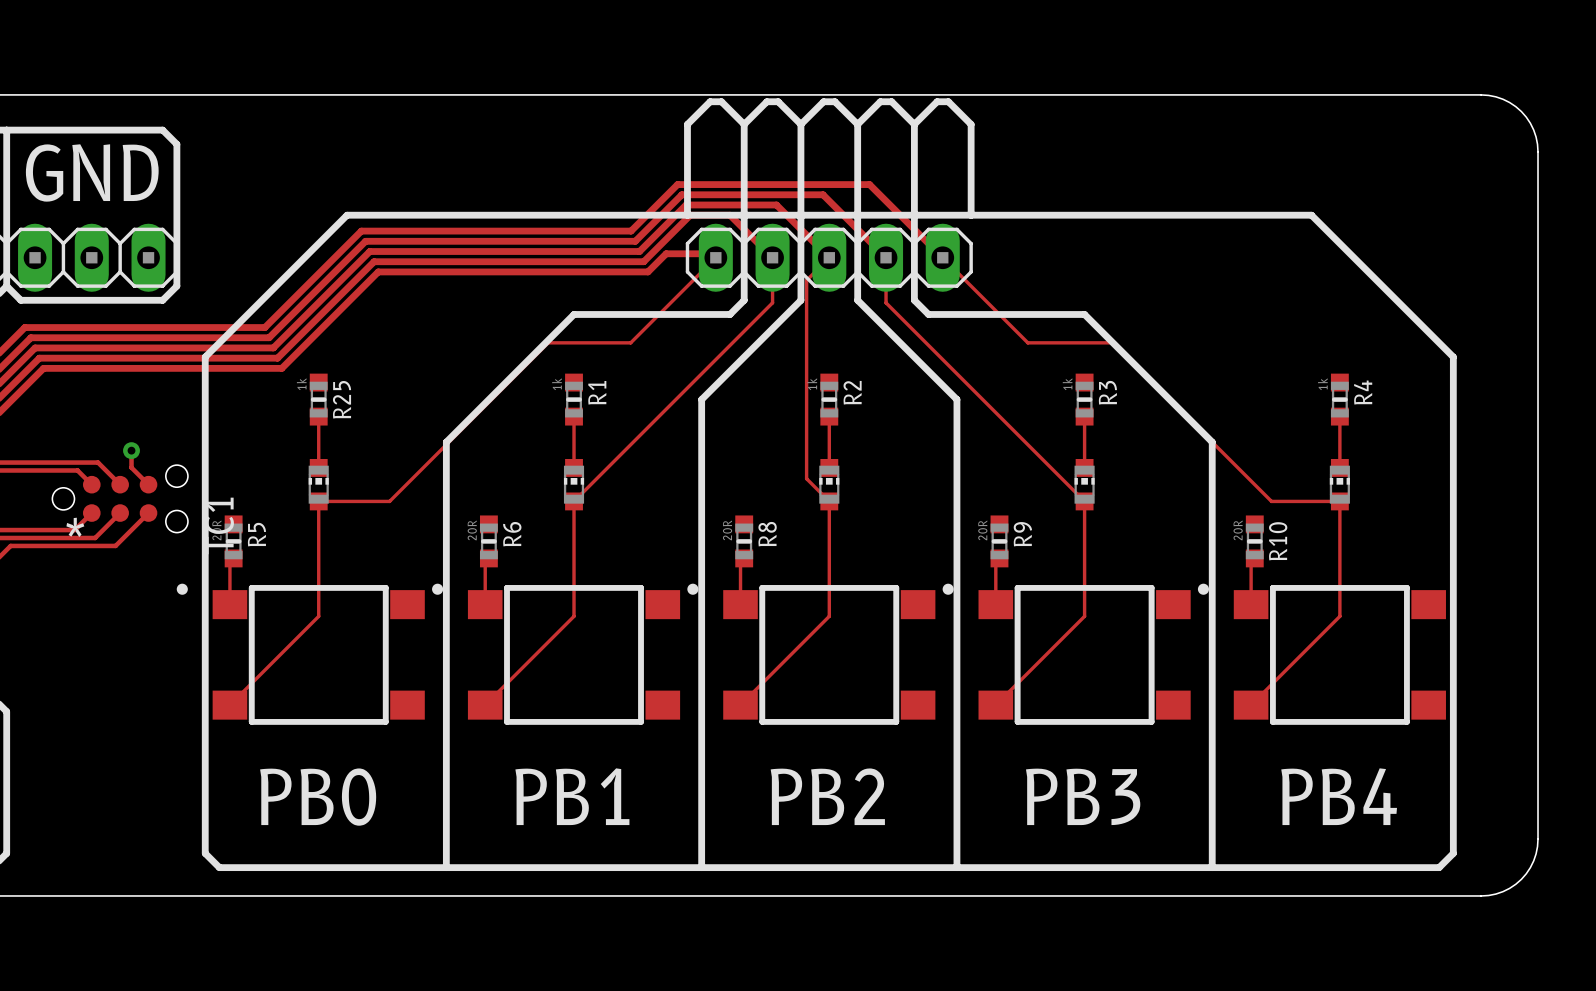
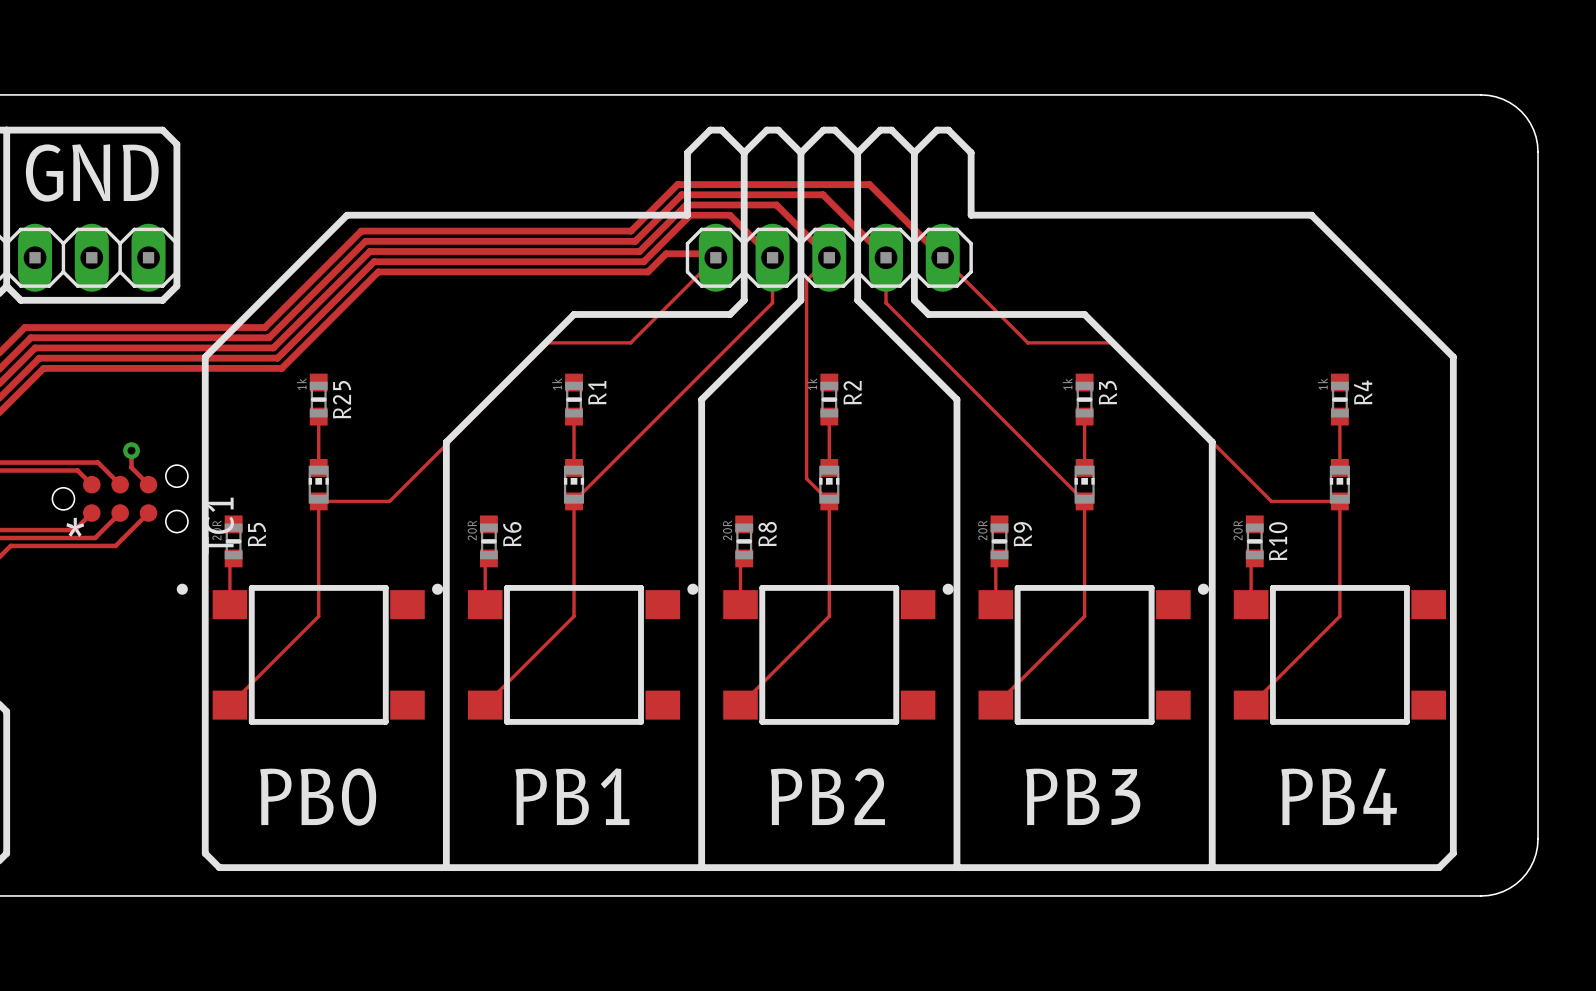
line: (744, 124) (744, 152) -> none
line: (744, 124) (766, 101) (778, 101) (800, 124) -> none
line: (744, 124) (721, 101) (710, 101) (687, 124) (687, 152) -> none
line: (800, 124) (800, 152) -> none
line: (800, 124) (823, 101) (834, 101) (857, 124) -> none
line: (857, 124) (857, 152) -> none
line: (857, 124) (880, 101) (891, 101) (914, 124) -> none
line: (914, 124) (937, 101) (948, 101) (971, 124) (971, 152) -> (687, 152) (710, 130) (721, 130) (744, 152) (766, 130) (778, 130) (800, 152) (823, 130) (834, 130) (857, 152) (880, 130) (891, 130) (914, 152) (937, 130) (948, 130) (971, 152)
line: (914, 124) (914, 152) -> none
line: (687, 215) (971, 215) -> none

